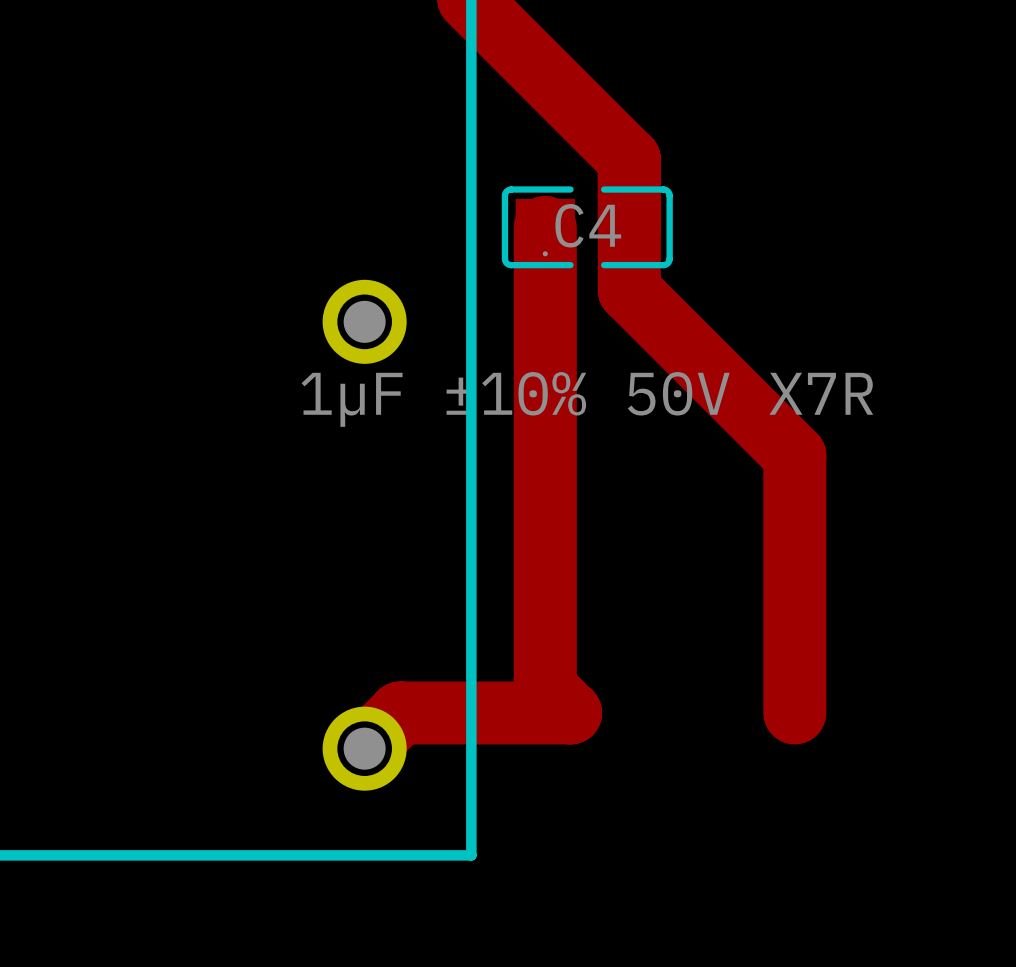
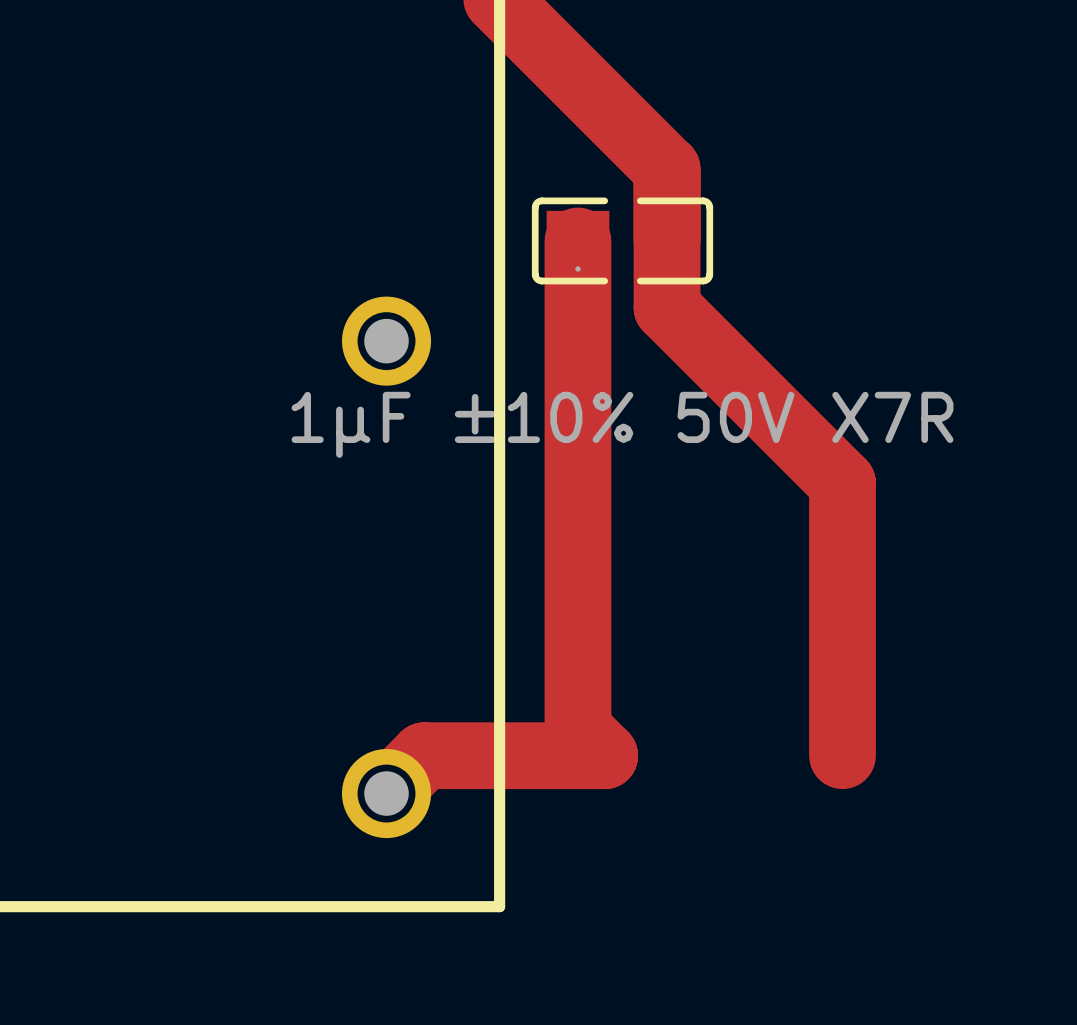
C4: 1µF ±10% 50V X7R (587, 227) -> none
part: none -> 1µF ±10% 50V X7R (622, 240)

